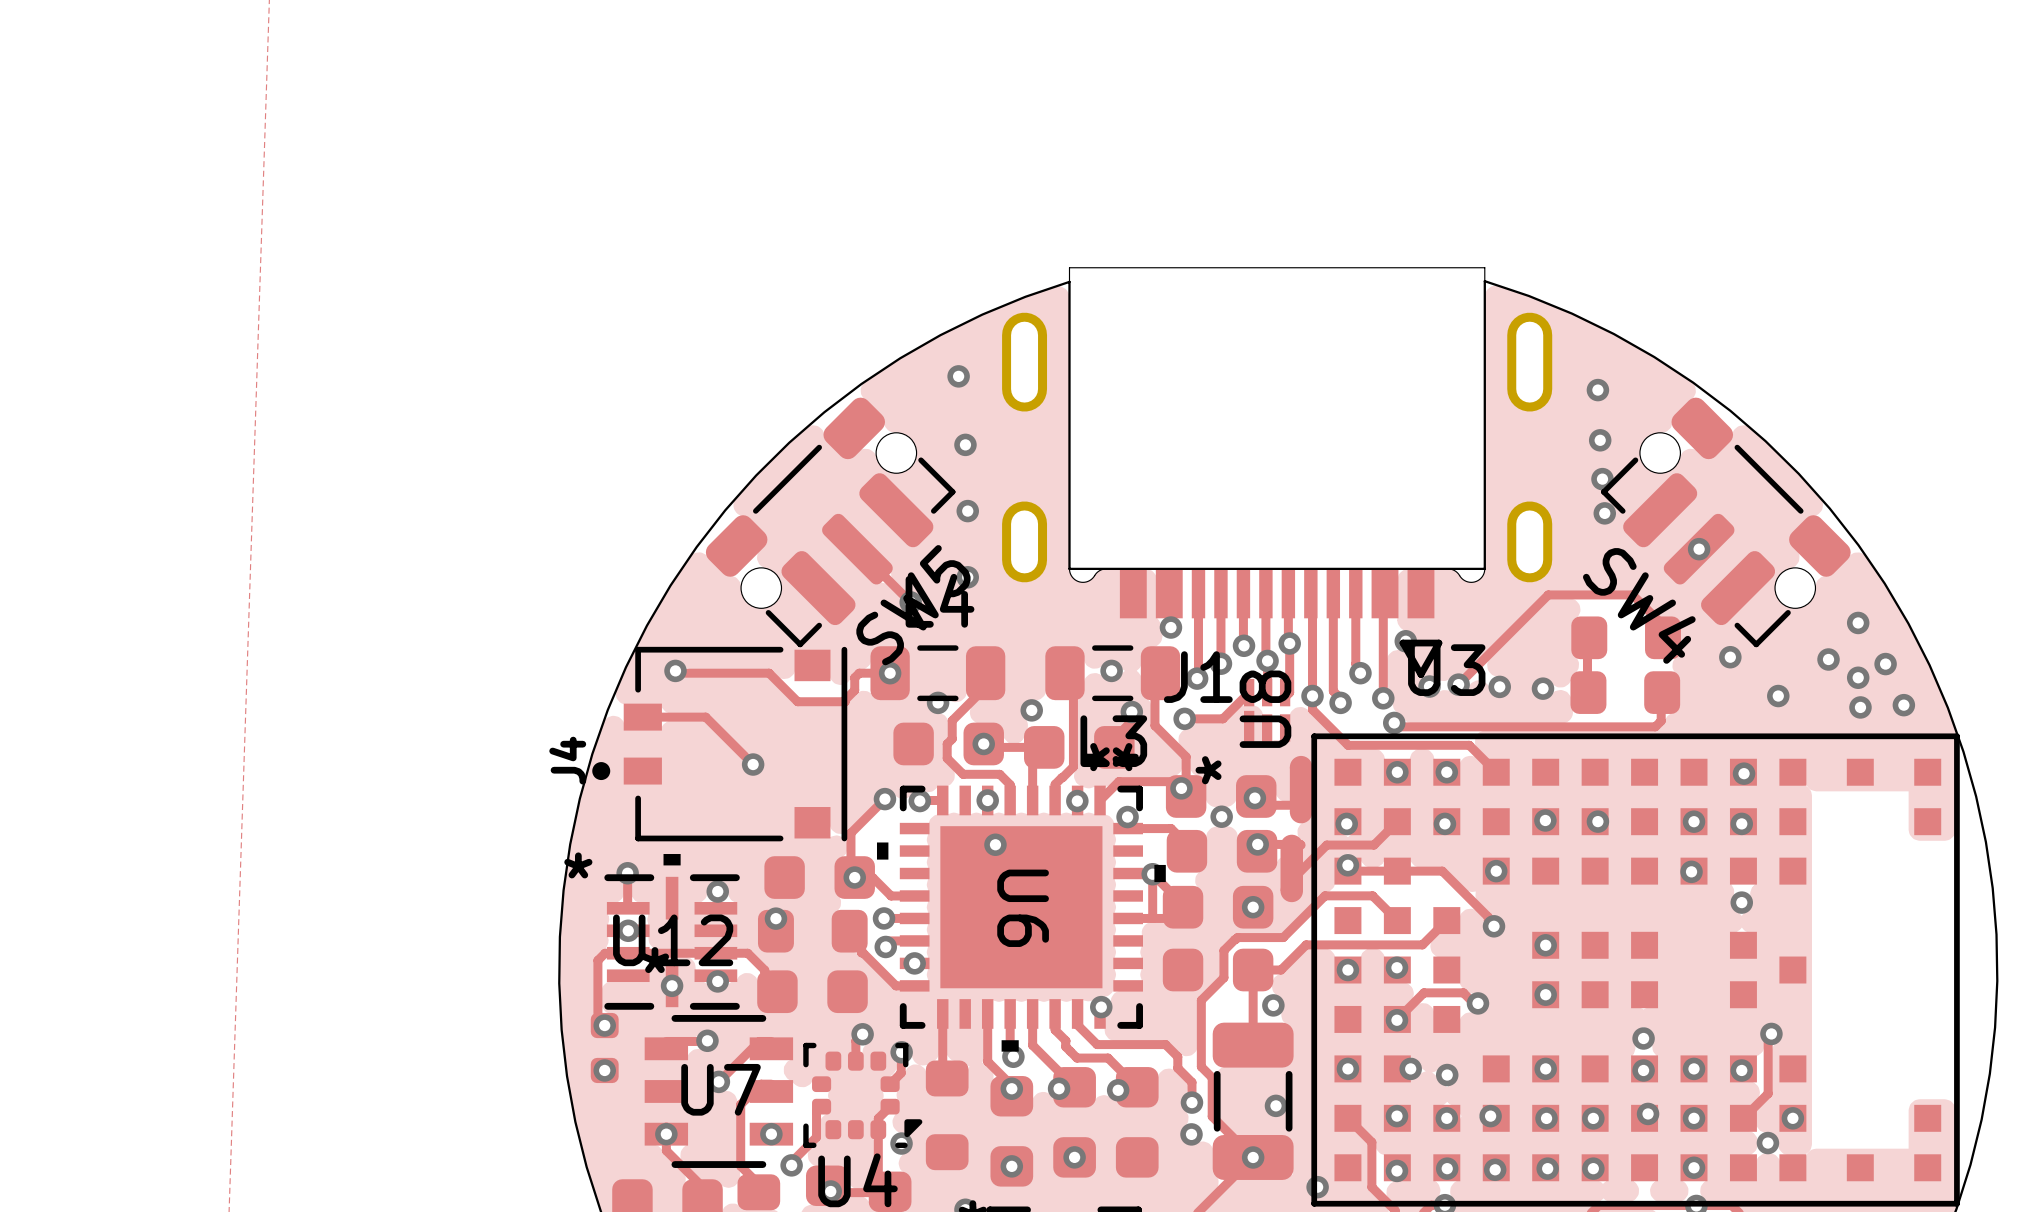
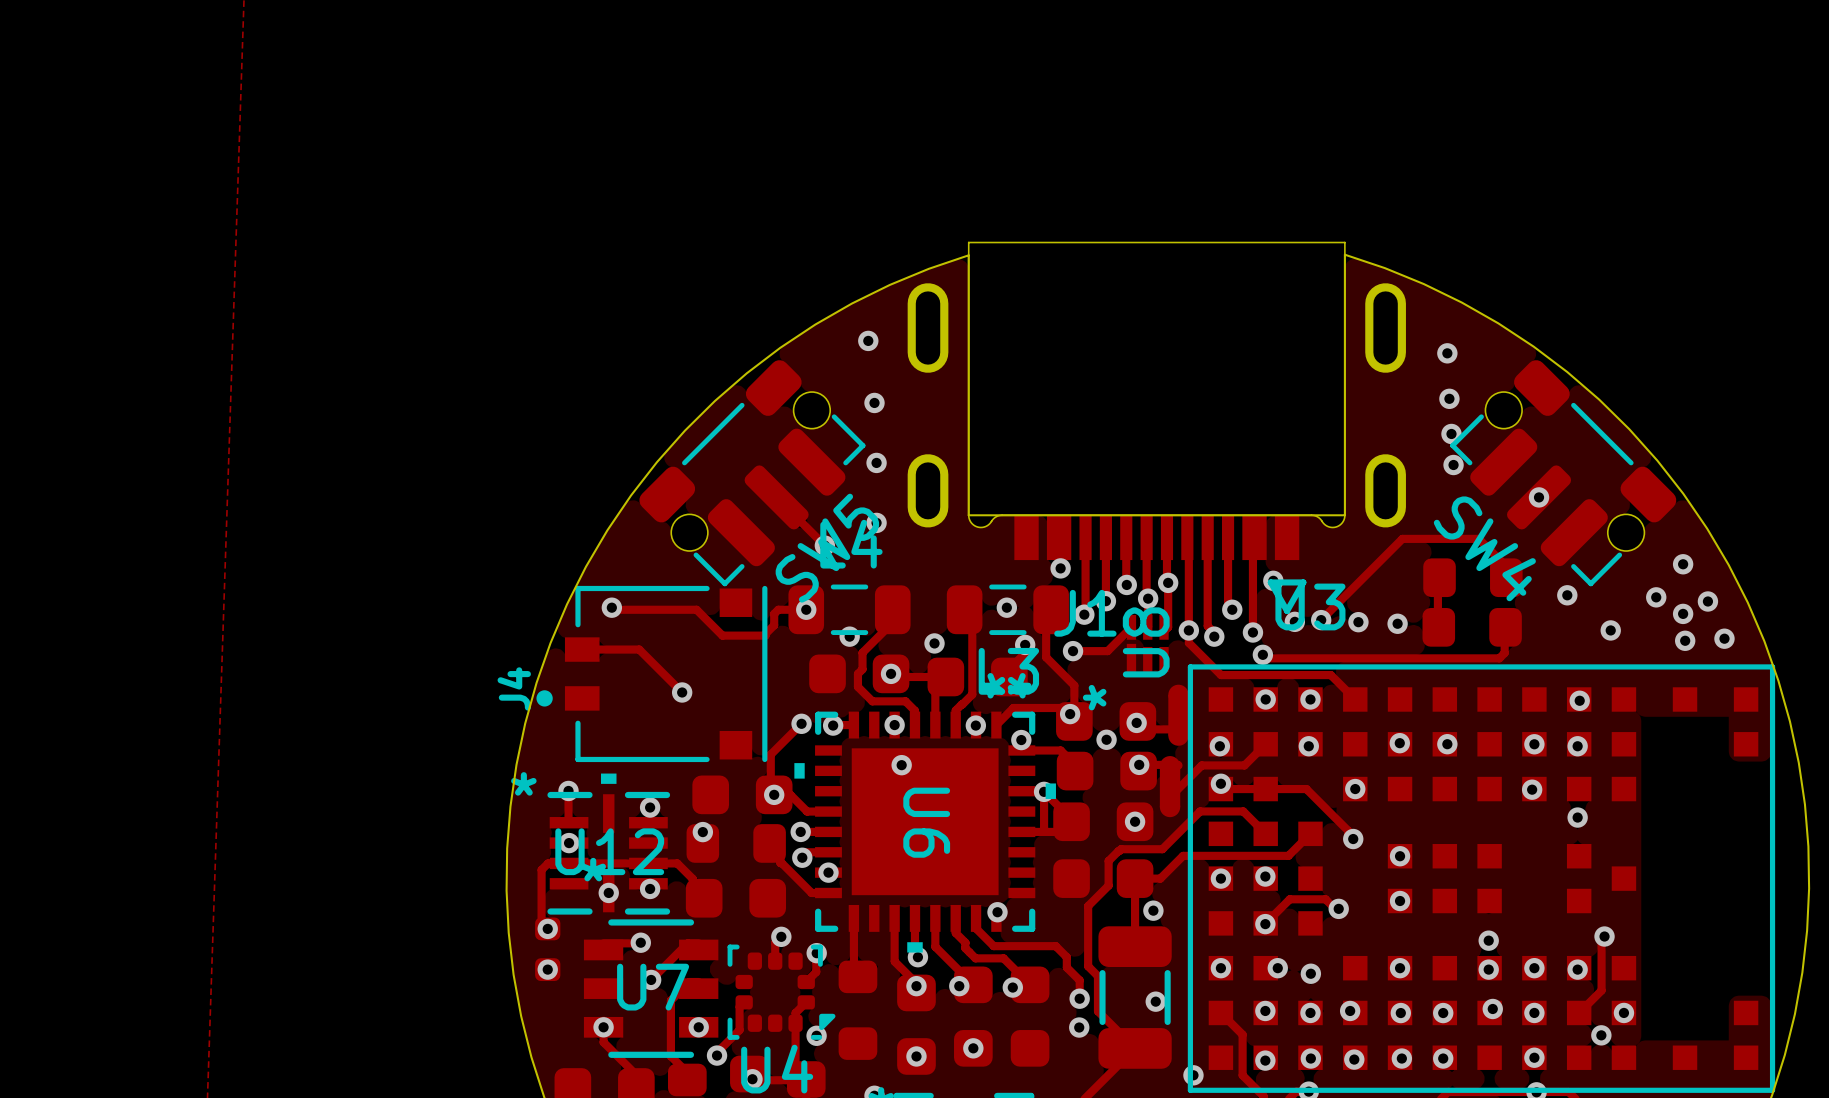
via: (1253, 1157) -> none

